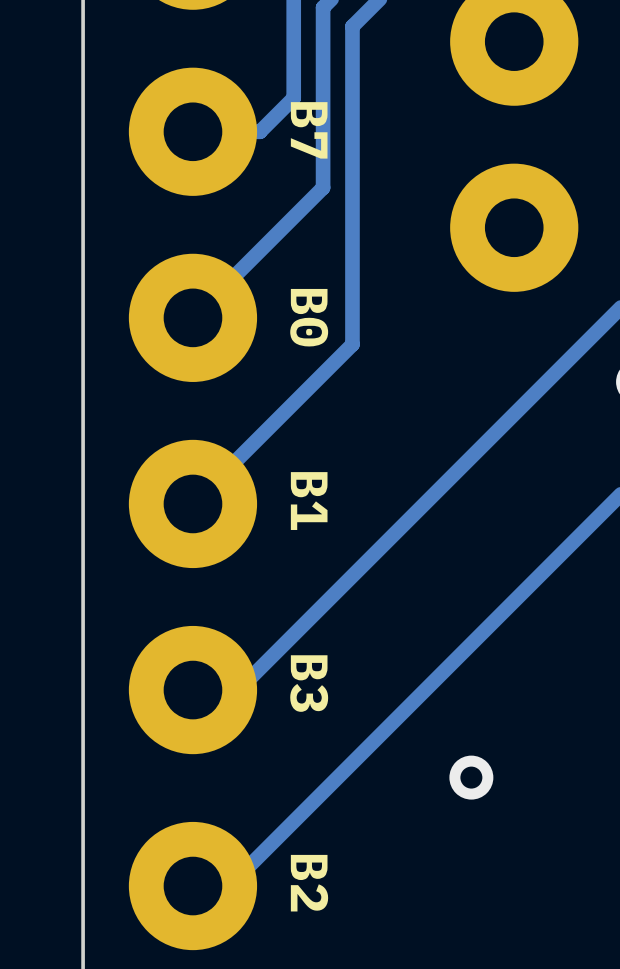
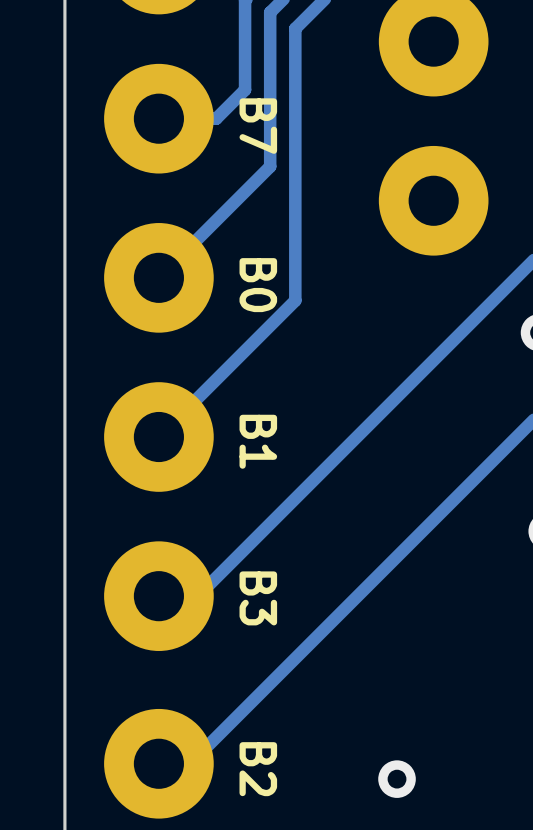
via position: (471, 777) -> (397, 779)

